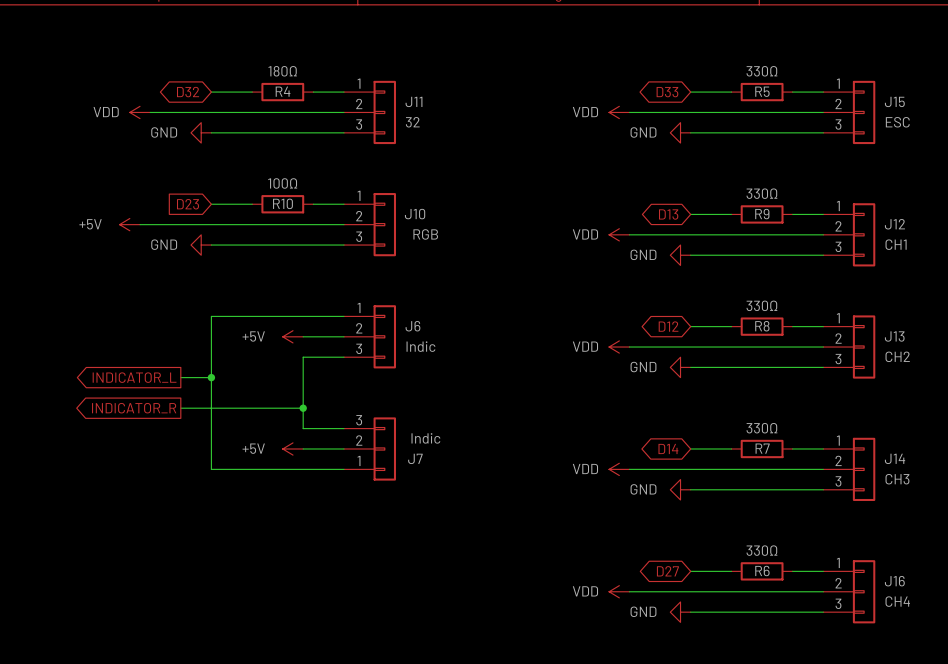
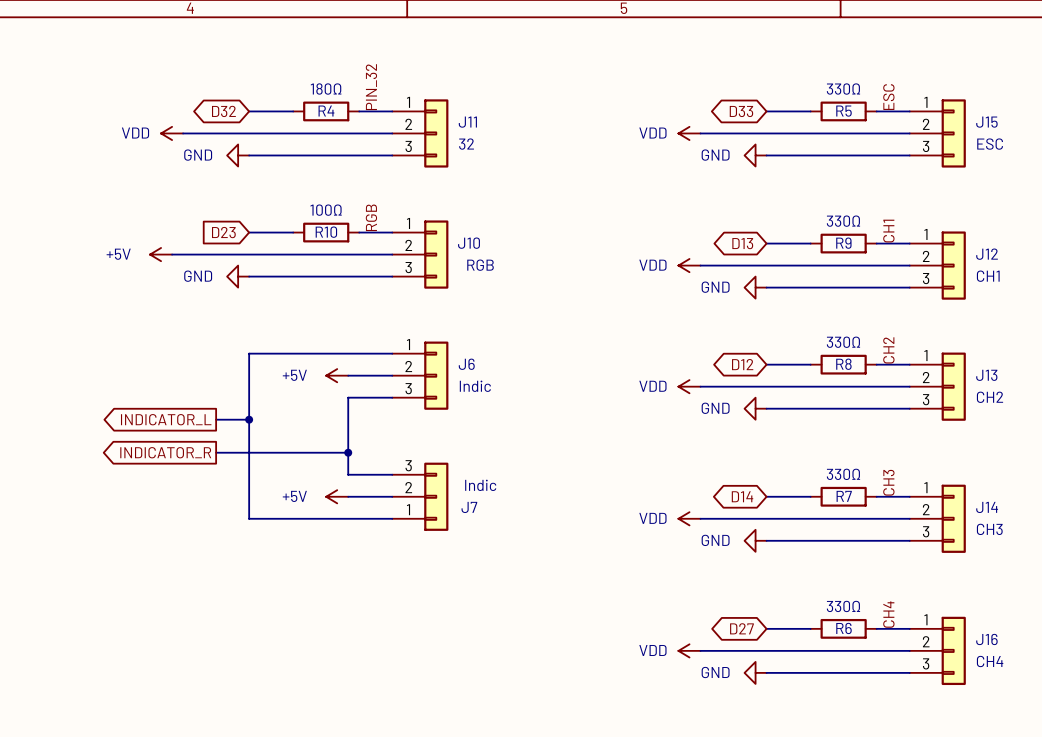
label: none -> PIN_32 (371, 87)
label: none -> ESC (888, 97)
label: none -> RGB (371, 217)
label: none -> CH1 (888, 231)
label: none -> CH2 (888, 350)
label: none -> CH3 (888, 482)
label: none -> CH4 (888, 614)

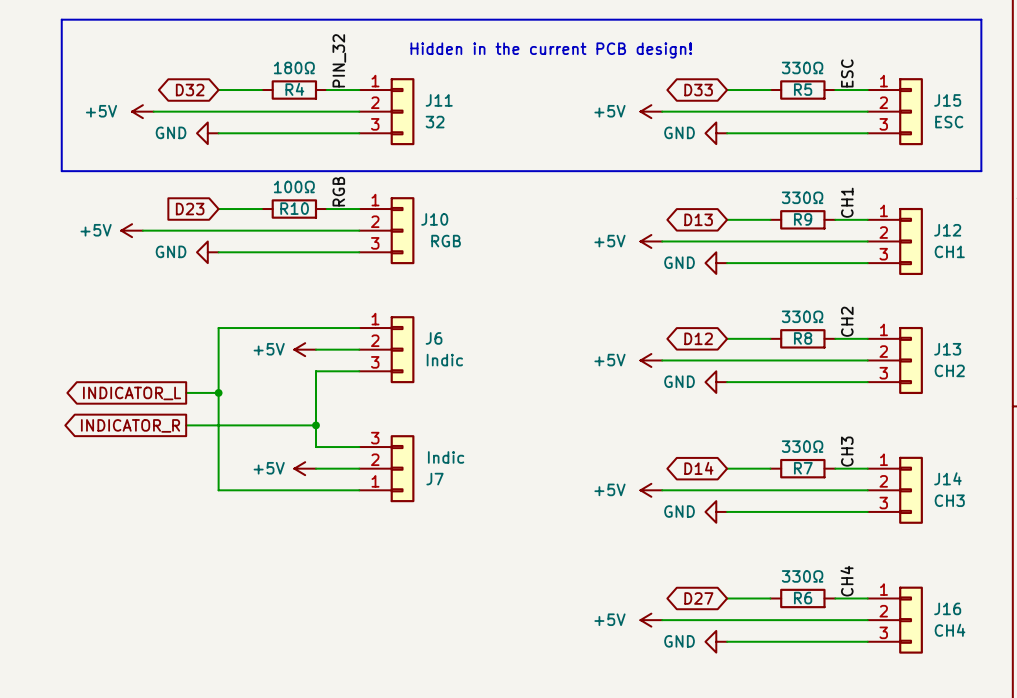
line: none -> (61, 19) (61, 171) (981, 171) (981, 19) (61, 19)
text: none -> Hidden in the current PCB design! (551, 50)
power symbol: VDD (172, 133) -> +5V (142, 111)
power symbol: VDD (689, 133) -> +5V (651, 111)
power symbol: VDD (689, 265) -> +5V (651, 241)
power symbol: VDD (689, 386) -> +5V (651, 360)
power symbol: VDD (689, 518) -> +5V (651, 490)
power symbol: VDD (689, 650) -> +5V (651, 620)

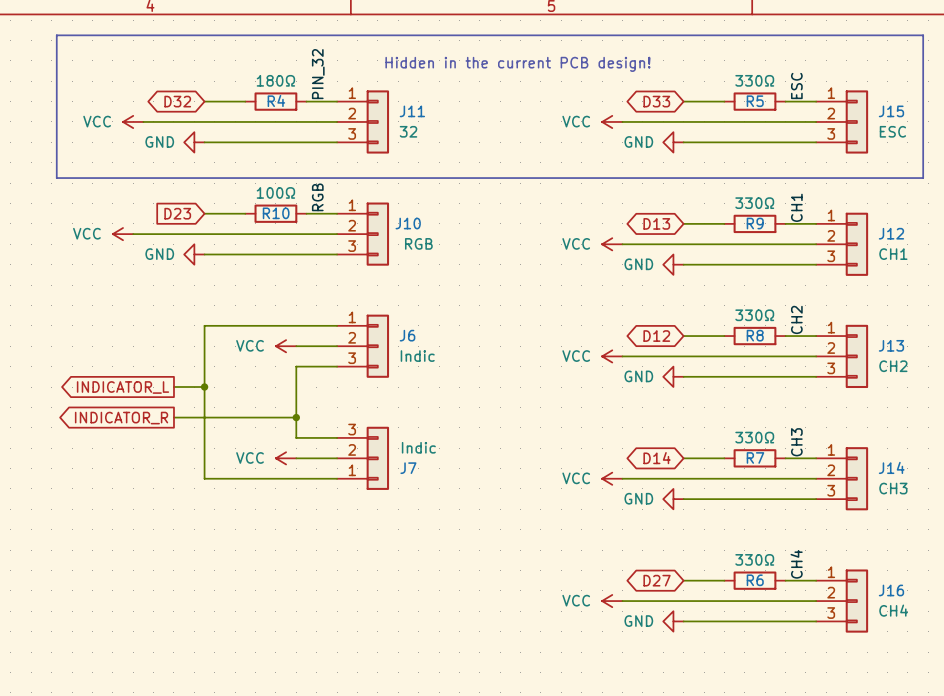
power symbol: +5V (142, 111) -> VCC (133, 121)
power symbol: +5V (651, 111) -> VCC (612, 121)
power symbol: +5V (132, 230) -> VCC (123, 234)
power symbol: +5V (651, 241) -> VCC (612, 244)
power symbol: +5V (305, 349) -> VCC (286, 346)
power symbol: +5V (651, 360) -> VCC (612, 356)
power symbol: +5V (305, 468) -> VCC (286, 458)
power symbol: +5V (651, 490) -> VCC (612, 478)
power symbol: +5V (651, 620) -> VCC (612, 601)

